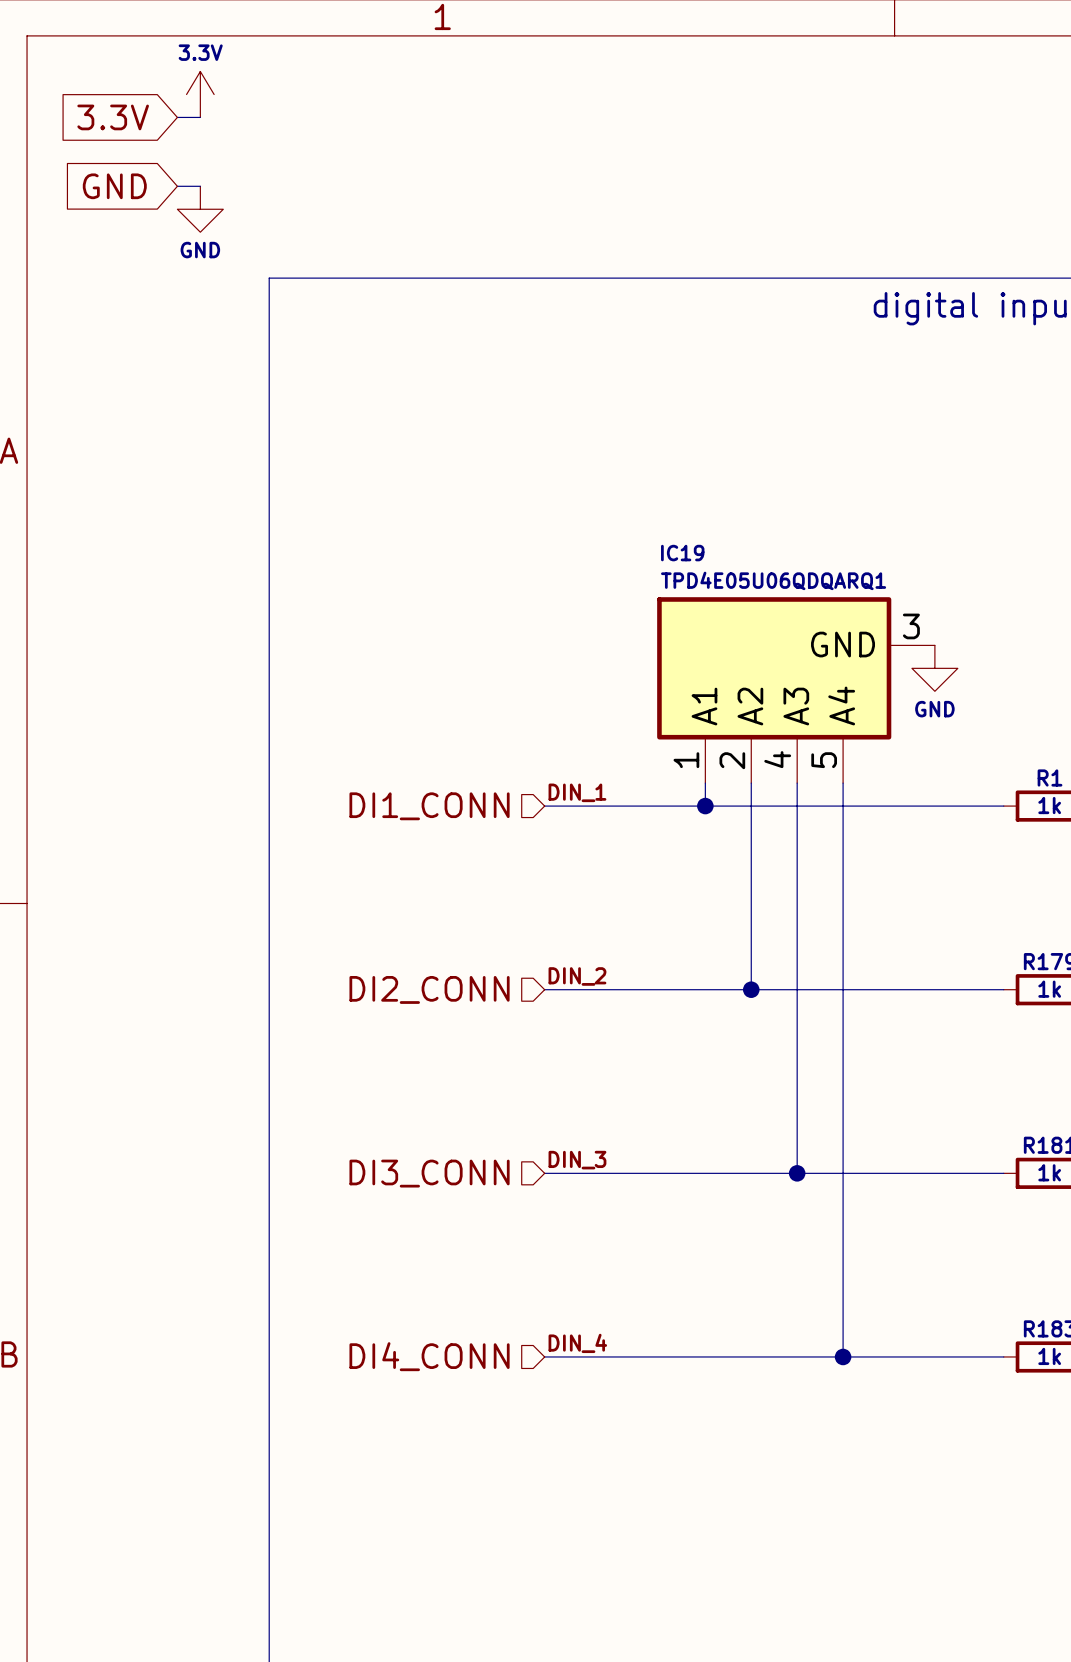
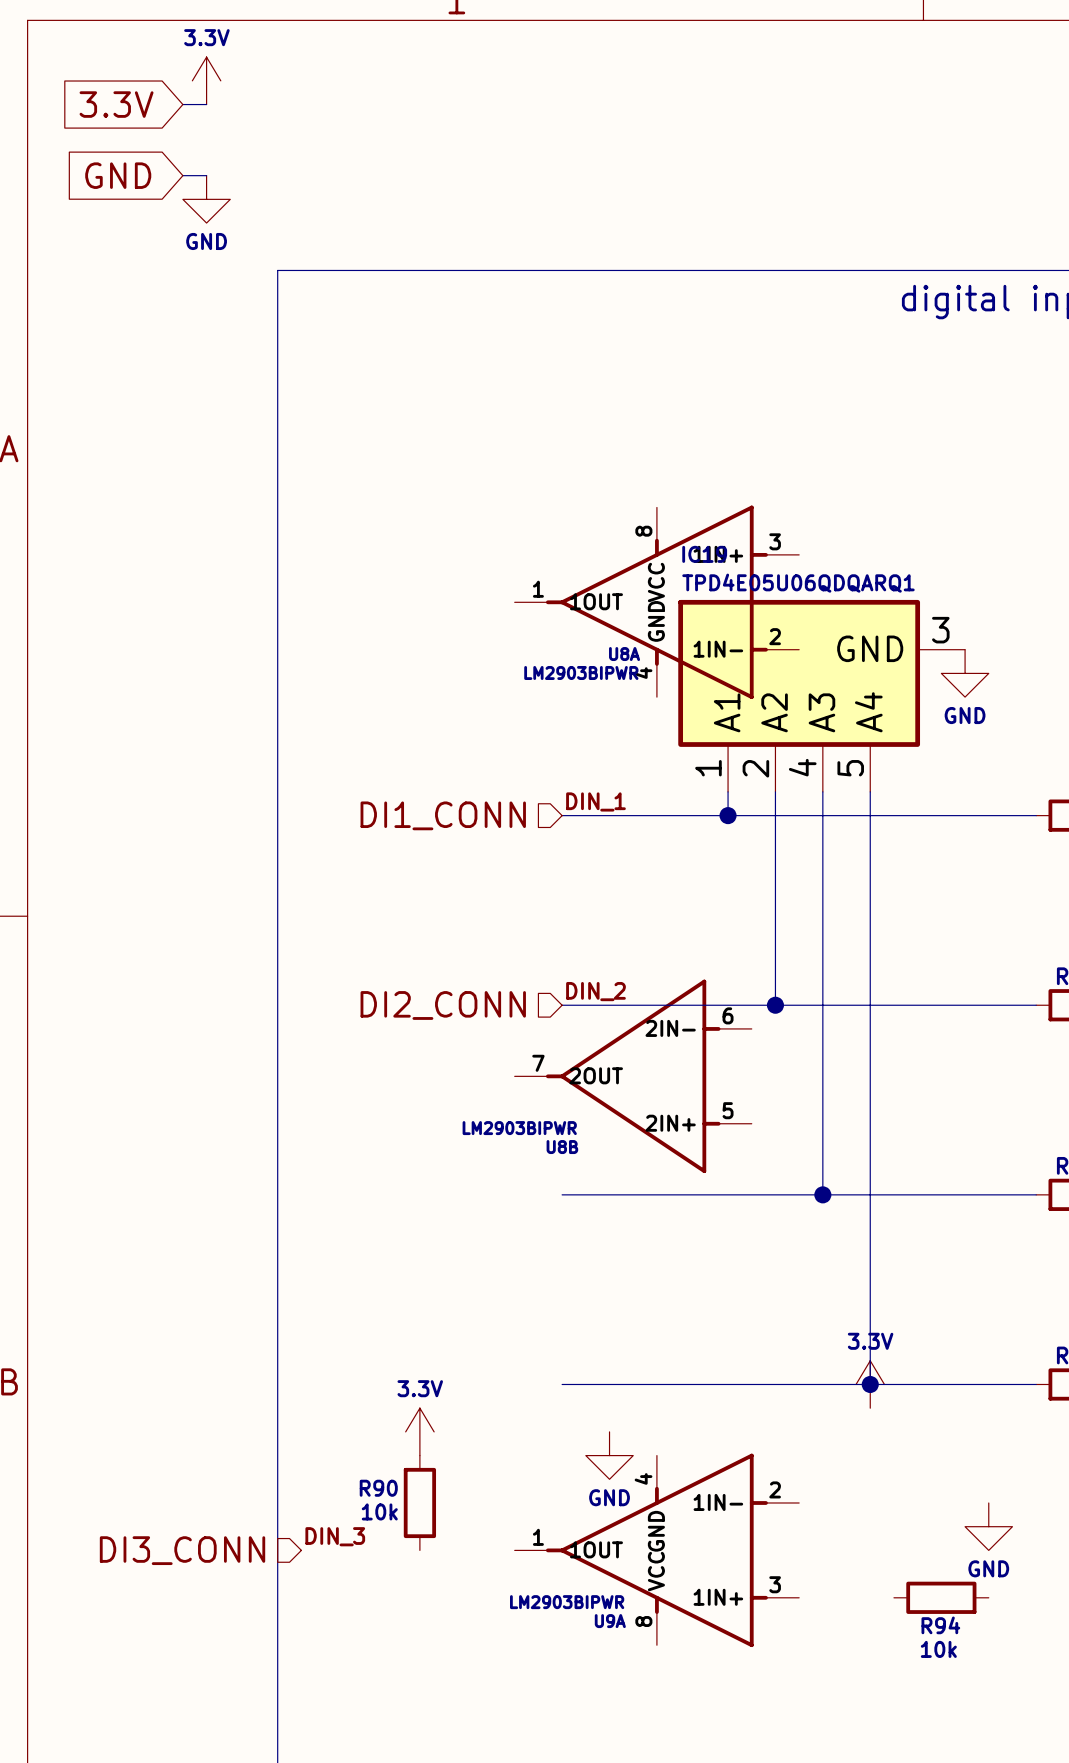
U8A: none -> LM2903BIPWR (656, 602)
U8B: none -> LM2903BIPWR (633, 1076)
label position: DIN_3 (577, 1160) -> DIN_3 (335, 1536)
hierarchical label position: DI3_CONN (429, 1173) -> DI3_CONN (182, 1550)
label: DIN_4 (577, 1343) -> none
hierarchical label: DI4_CONN (429, 1356) -> none
power symbol: none -> 3.3V (870, 1384)
power symbol: none -> 3.3V (419, 1431)
power symbol: none -> GND (609, 1455)
R90: none -> 10k (419, 1502)
power symbol: none -> GND (988, 1526)
U9A: none -> LM2903BIPWR (656, 1550)
R94: none -> 10k (941, 1597)

